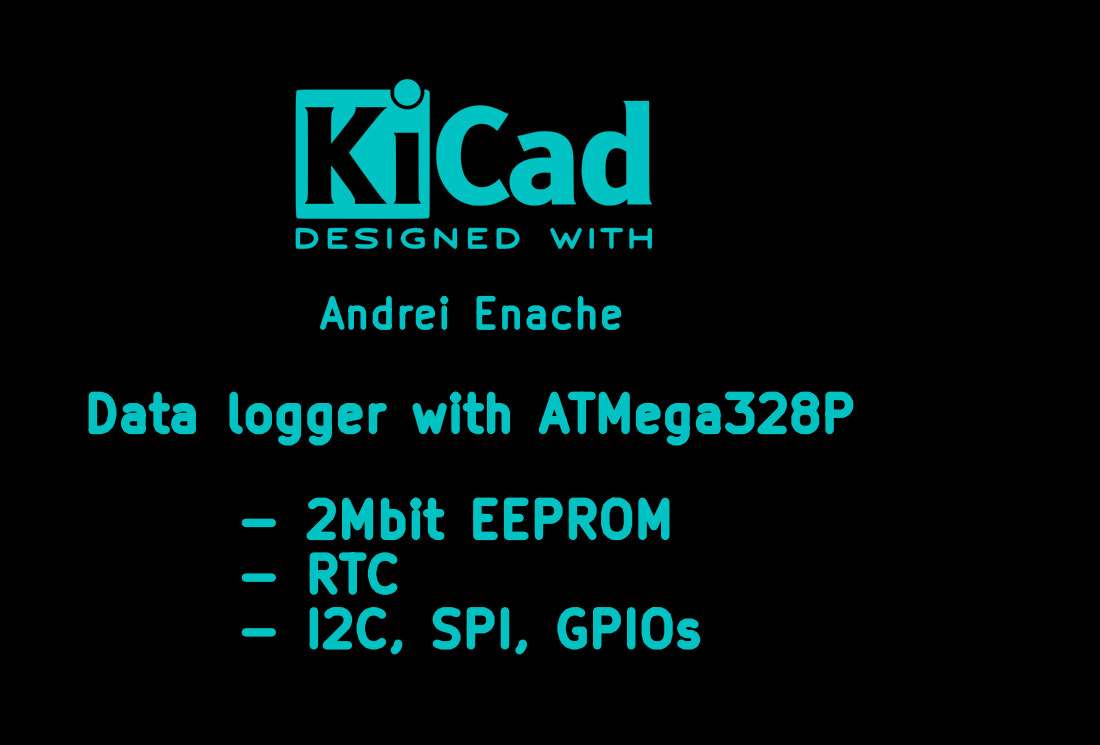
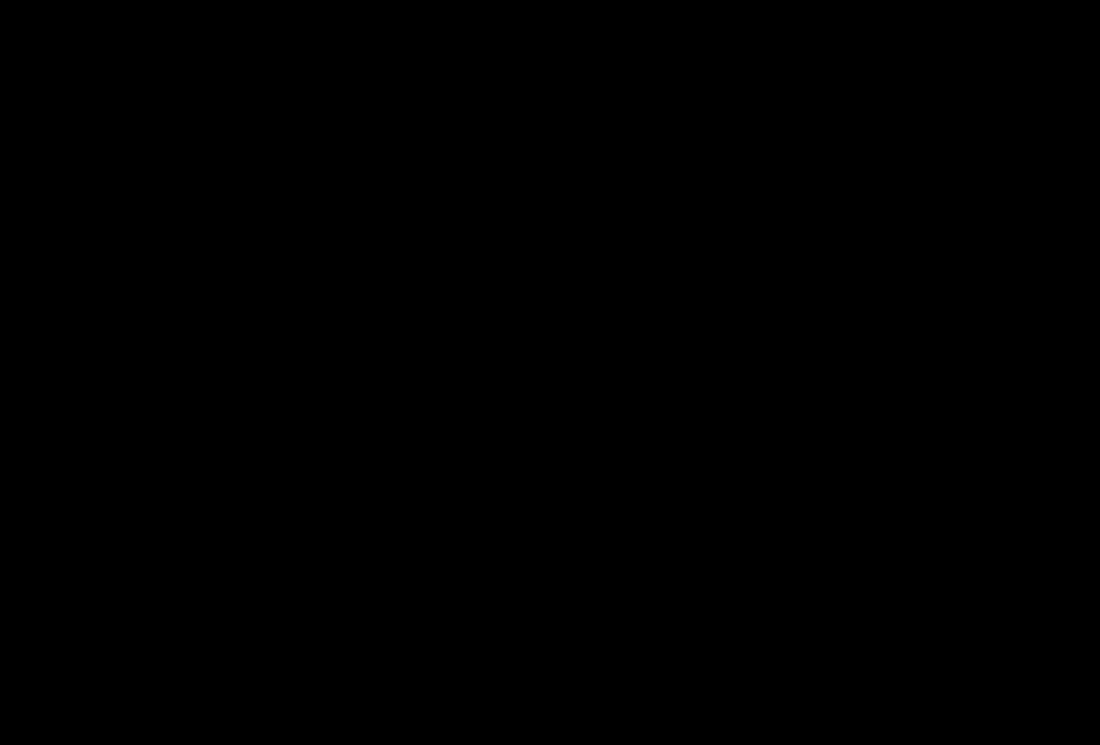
drawing: [295, 79, 653, 249] -> none
text: Andrei Enache (470, 312) -> none
text: Data logger with ATMega328P (470, 418) -> none
text: - 2Mbit EEPROM (455, 518) -> none
text: - RTC (319, 573) -> none
text: - I2C, SPI, GPIOs (470, 630) -> none

